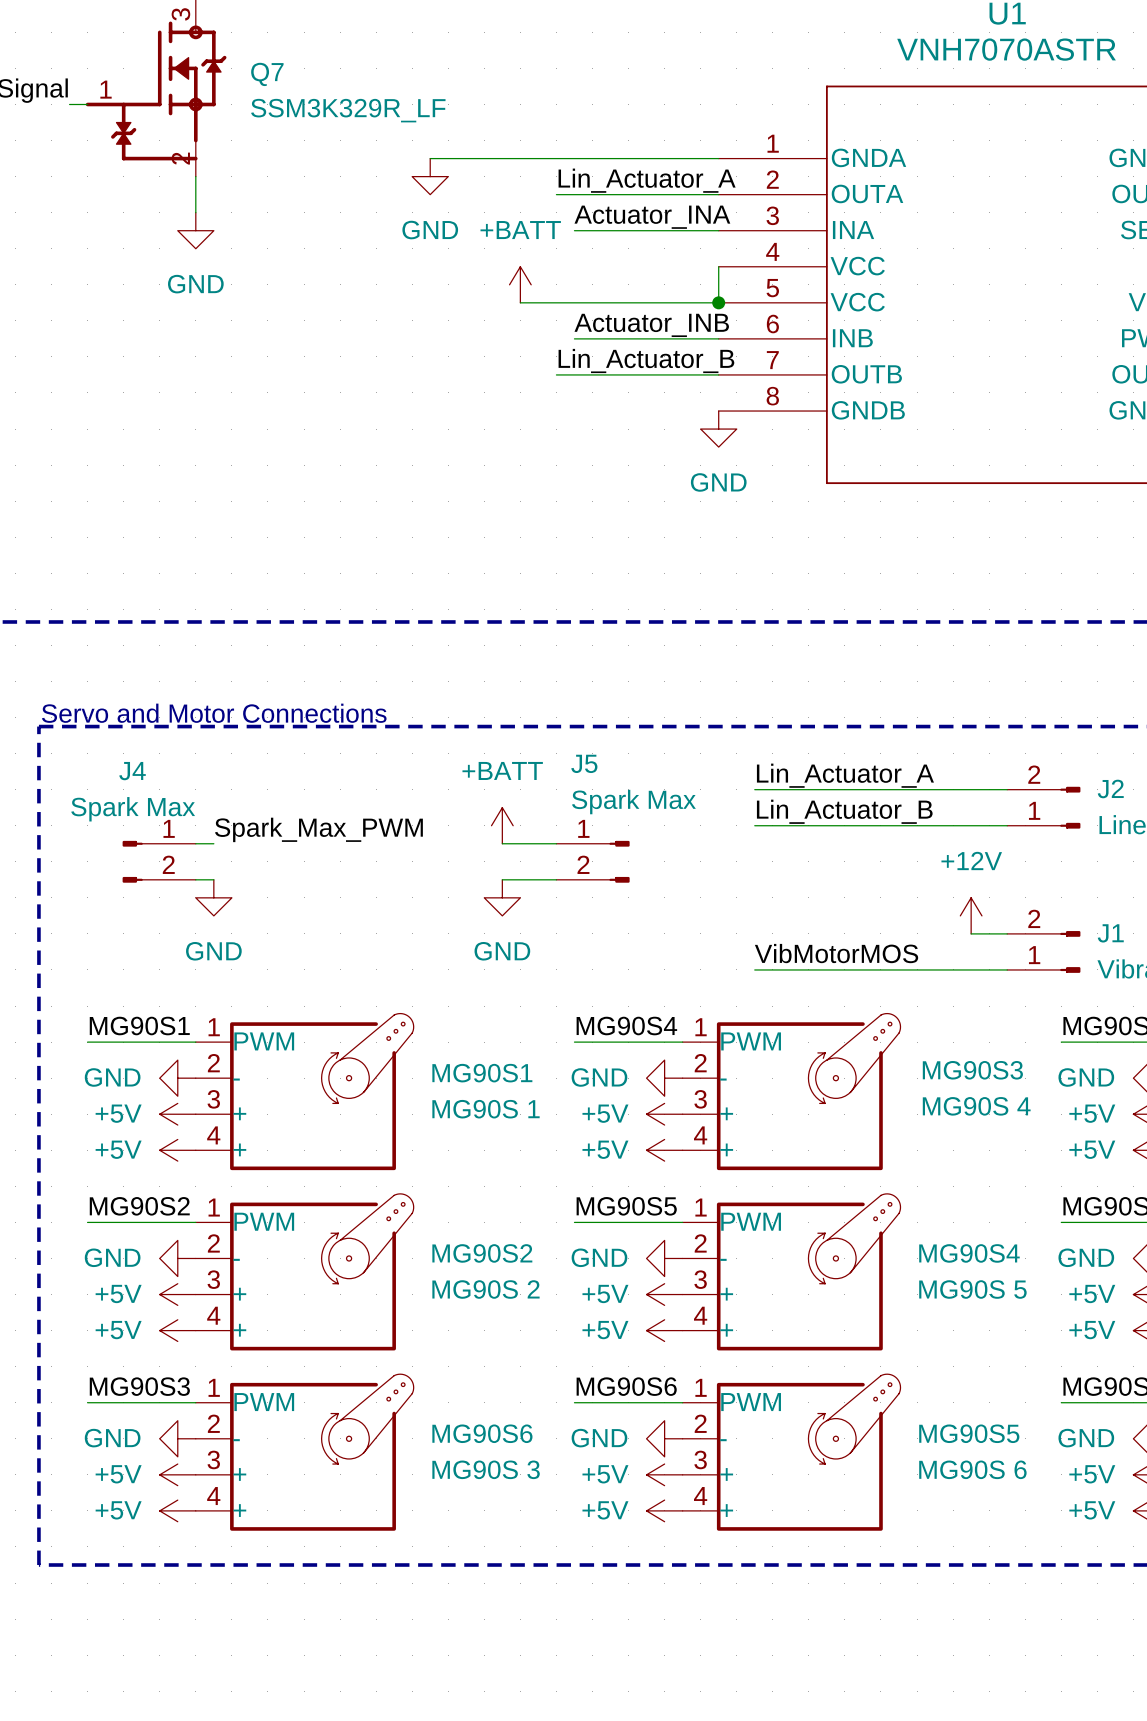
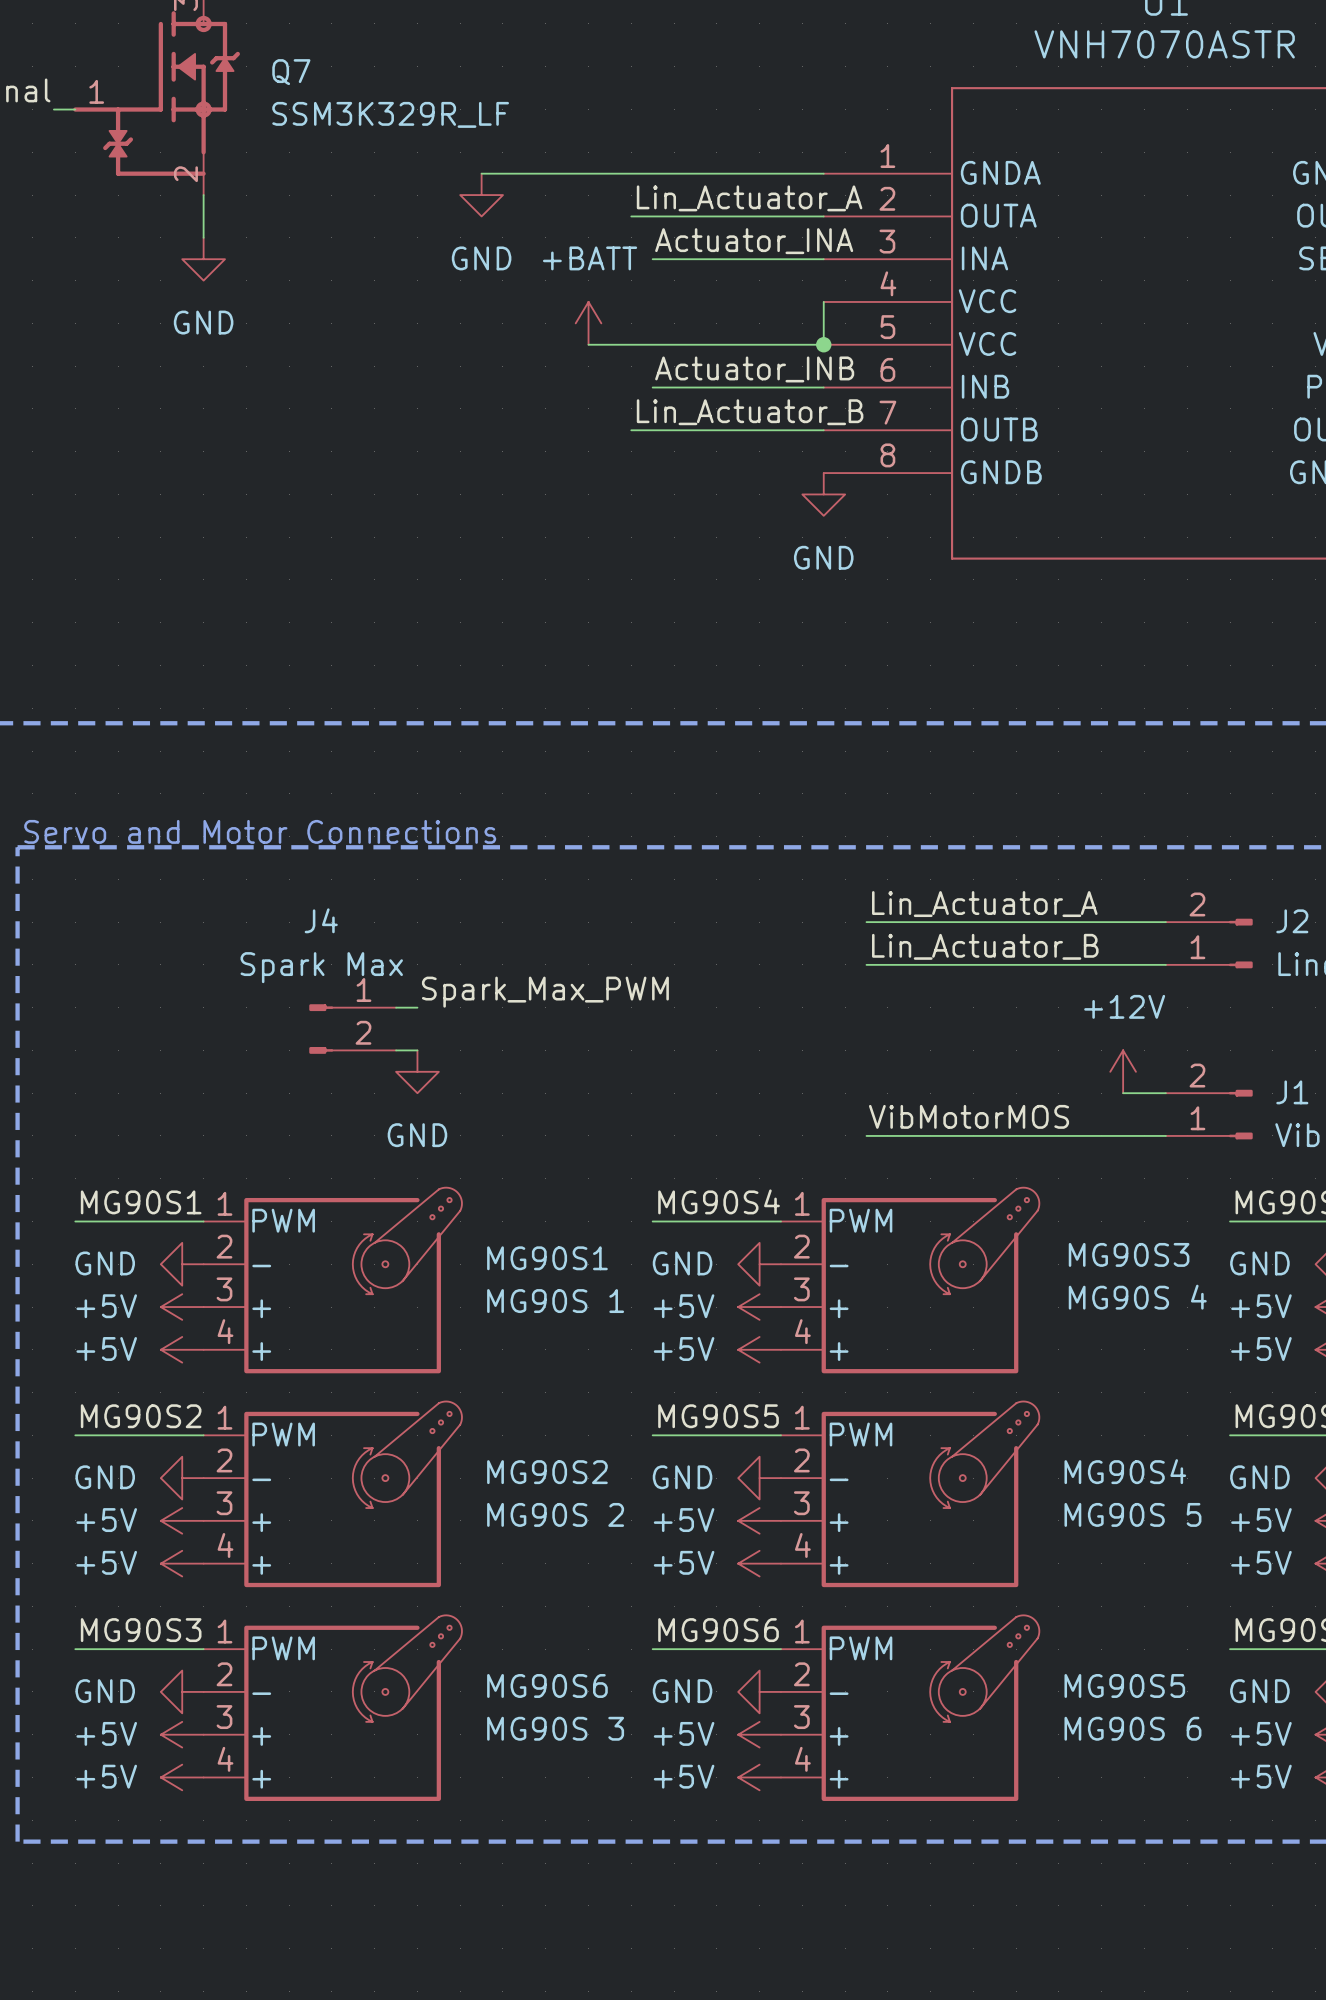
power symbol: +BATT (502, 825) -> none
label position: Spark_Max_PWM (318, 829) -> Spark_Max_PWM (545, 992)
wire: (195, 843) (213, 843) -> (396, 1007) (417, 1007)
wire: (502, 843) (556, 843) -> none
J4 position: (159, 861) -> (352, 1029)
J5: Spark Max (593, 861) -> none
wire: (195, 879) (213, 879) -> (396, 1050) (417, 1050)
wire: (502, 879) (556, 879) -> none
power symbol: GND (213, 897) -> none
power symbol: GND (502, 897) -> none
power symbol: none -> GND (417, 1071)

